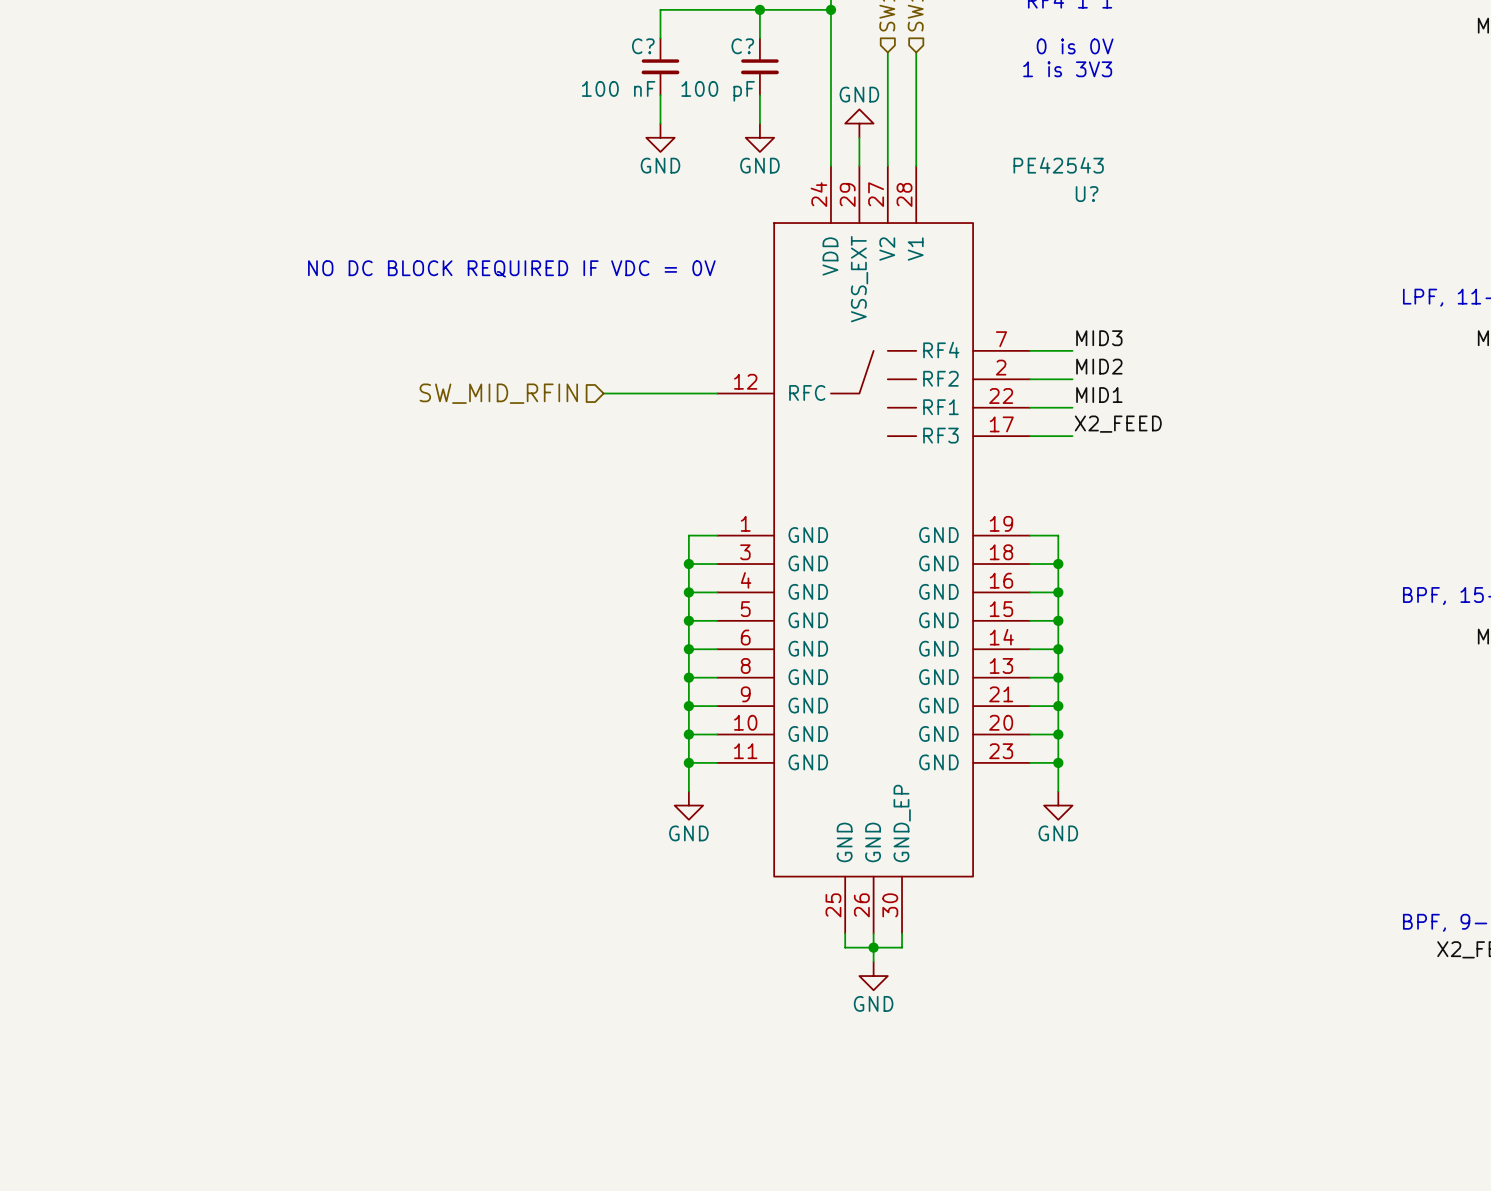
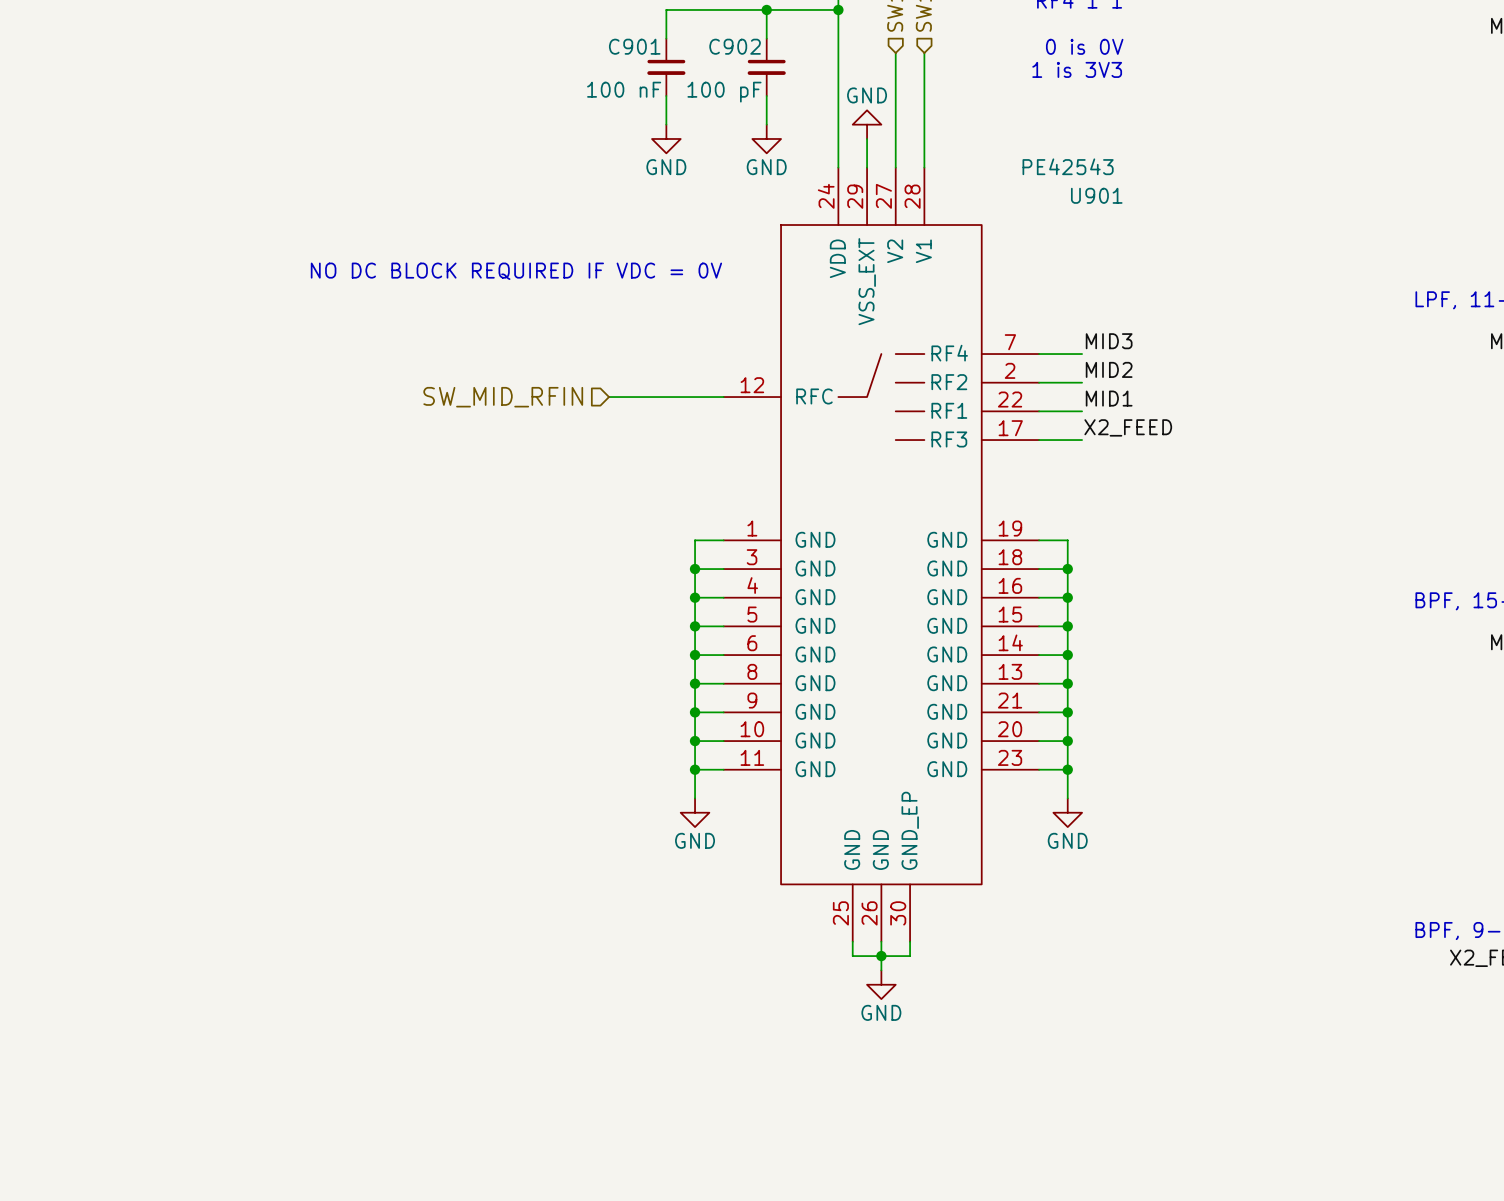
C? name: C? (643, 46) -> C901 (634, 46)
C? name: C? (742, 46) -> C902 (735, 46)
U? name: U? (1087, 194) -> U901 (1096, 195)

